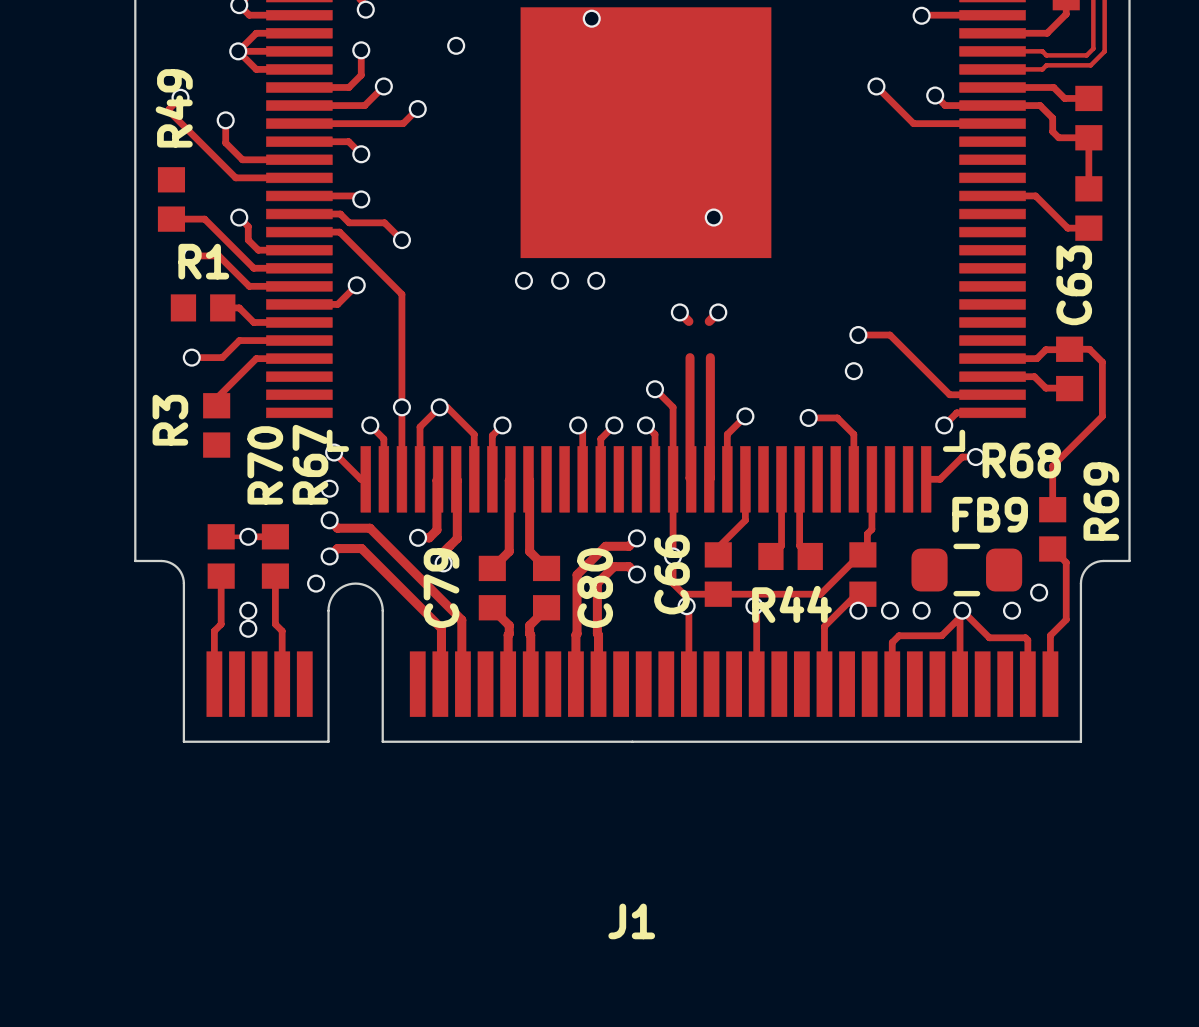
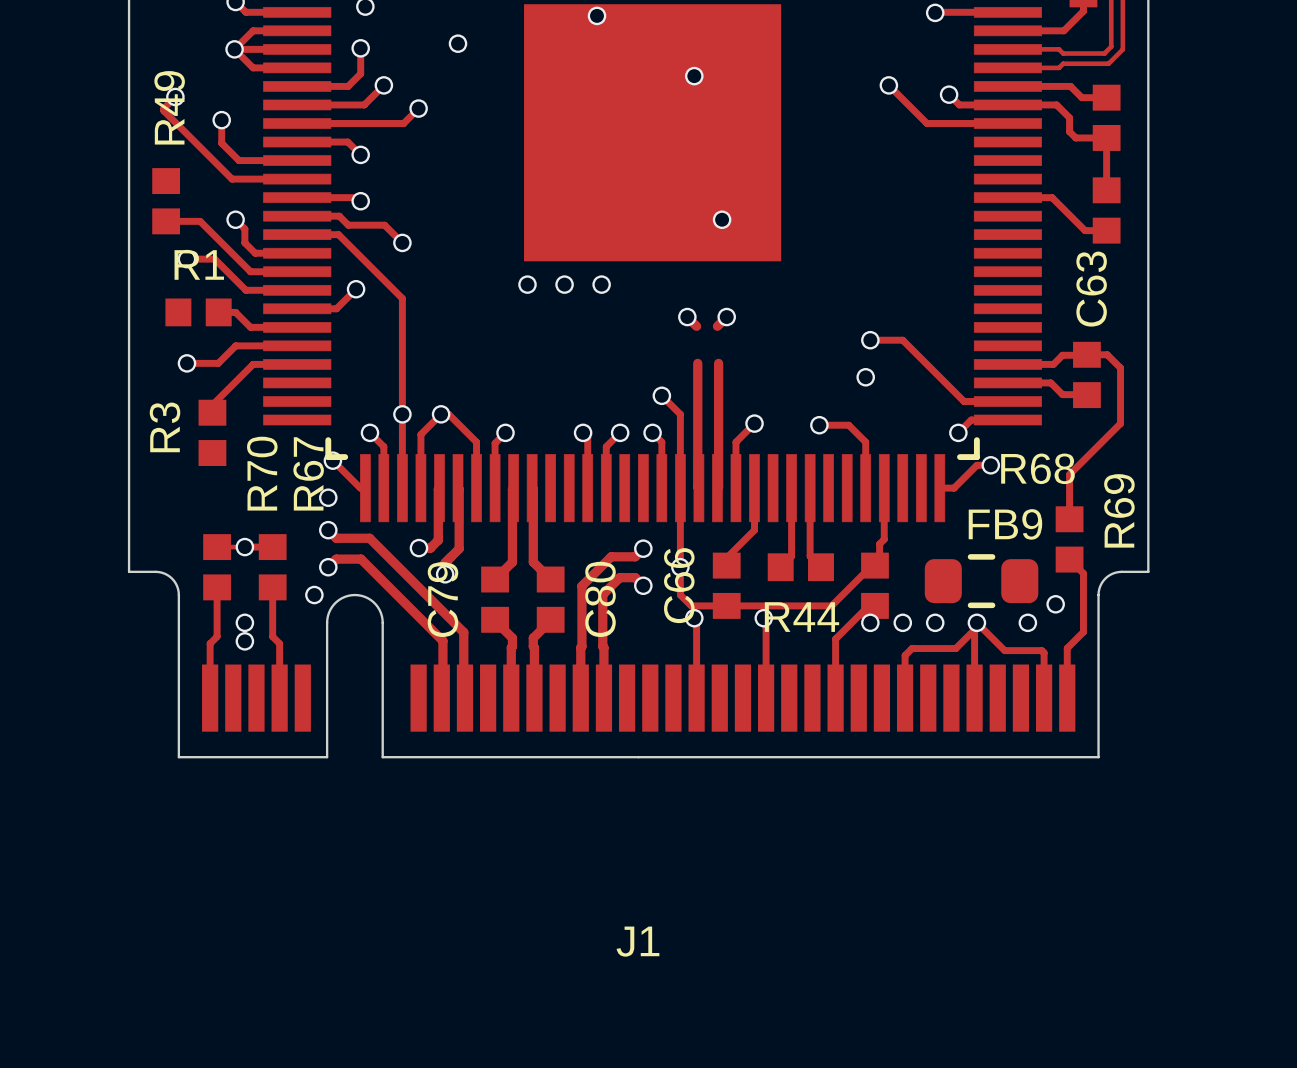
via: none -> (694, 76)

